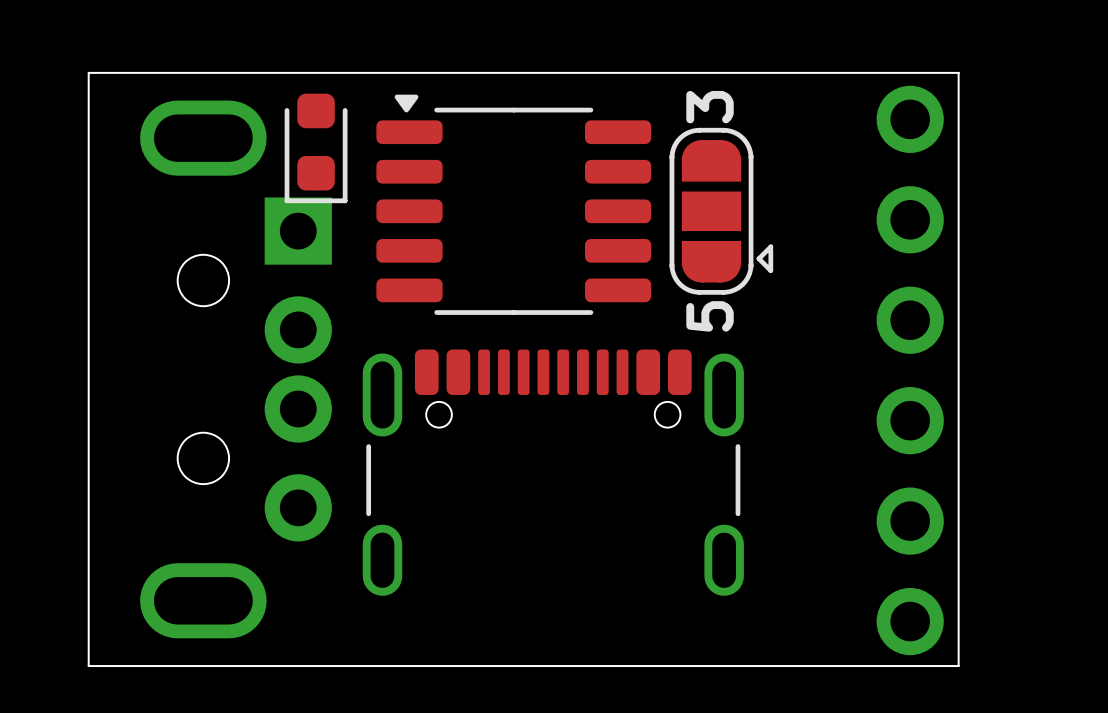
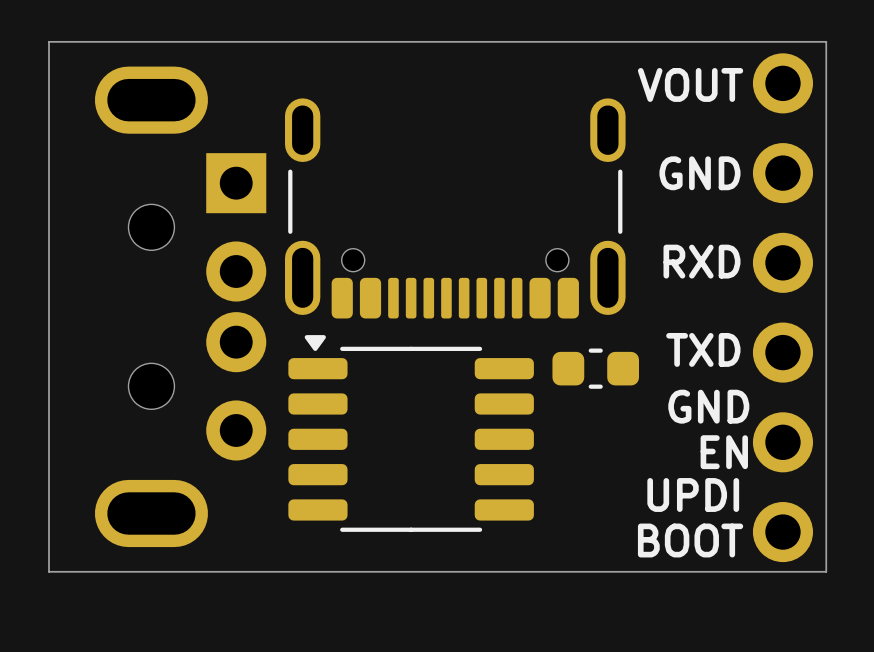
text: none -> VOUT (690, 84)
part: (316, 148) -> none
part position: (513, 204) -> (411, 433)
part: (721, 211) -> none
text: none -> GND (699, 173)
text: none -> RXD (701, 261)
text: none -> TXD (703, 349)
part: none -> (595, 368)
part rotation: 0° (553, 472) -> 180° (455, 208)
text: none -> GND (708, 406)
text: none -> EN (724, 452)
text: none -> UPDI (693, 494)
text: none -> BOOT (690, 540)

